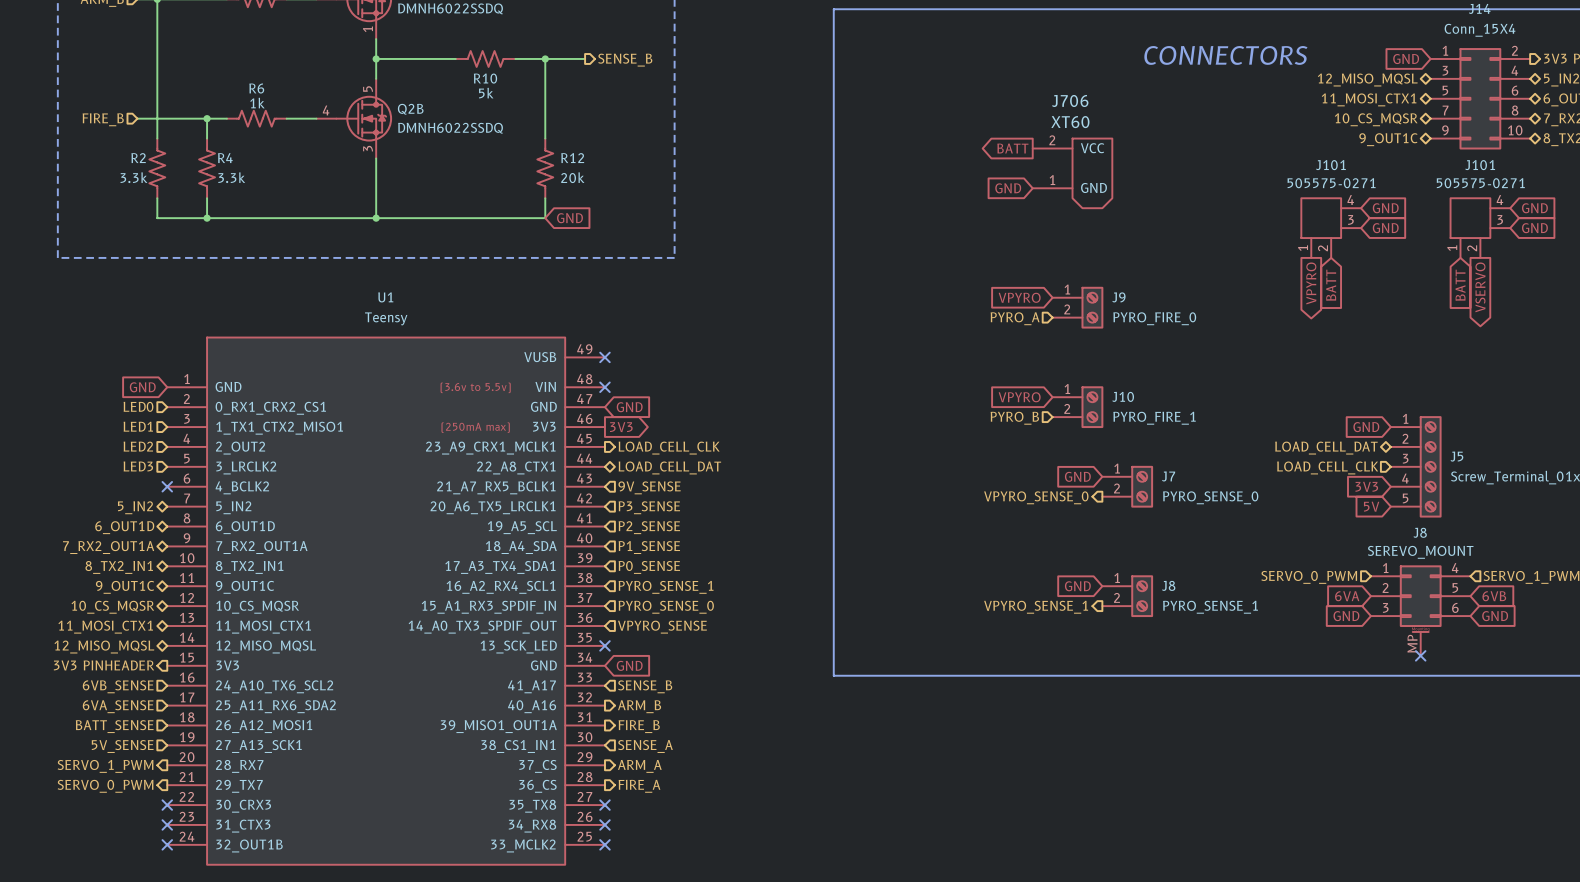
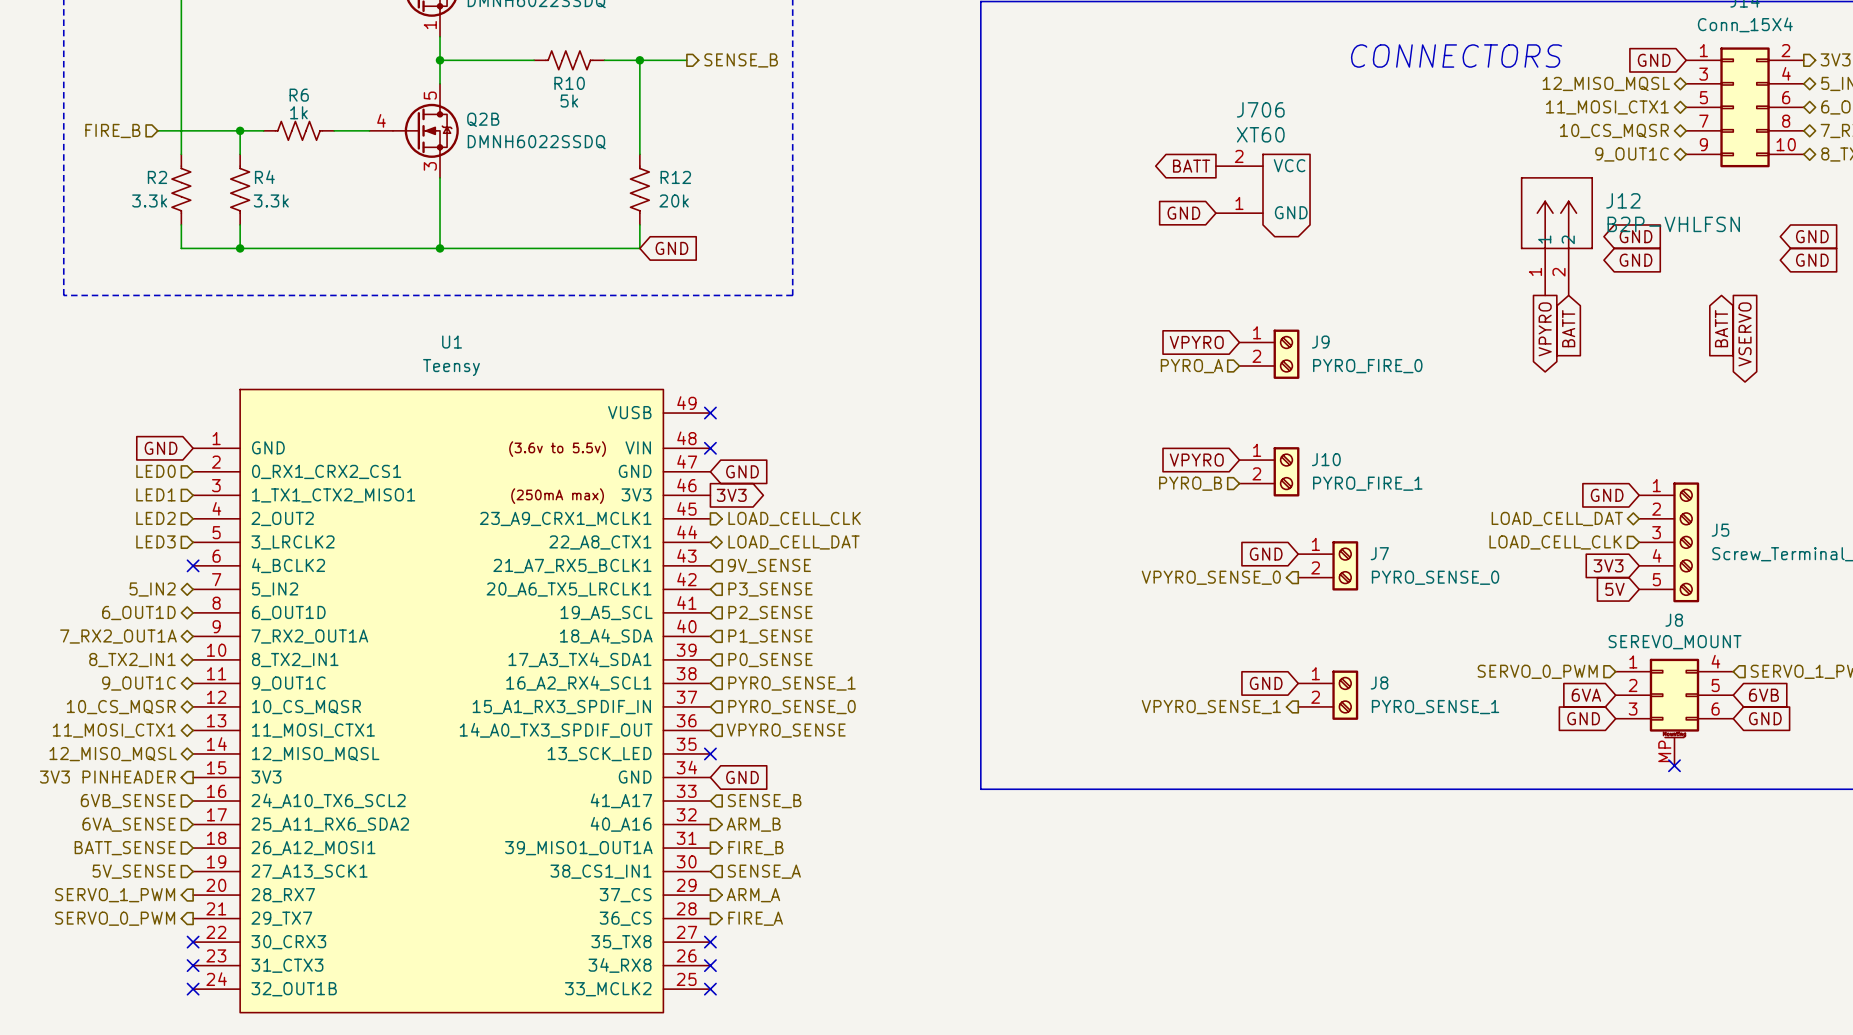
J12: none -> B2P-VHLFSN (1556, 236)
J101: 505575-0271 (1331, 228) -> none
J101: 505575-0271 (1480, 228) -> none

